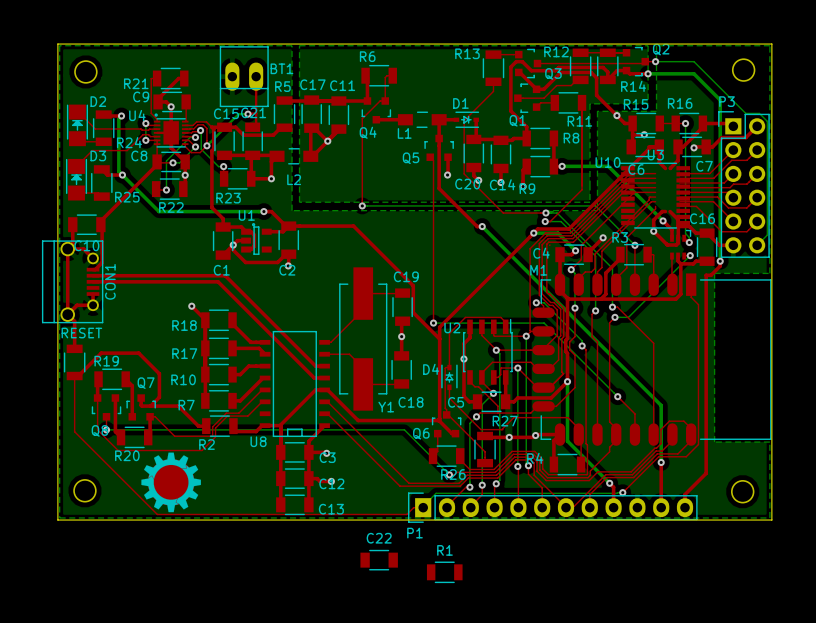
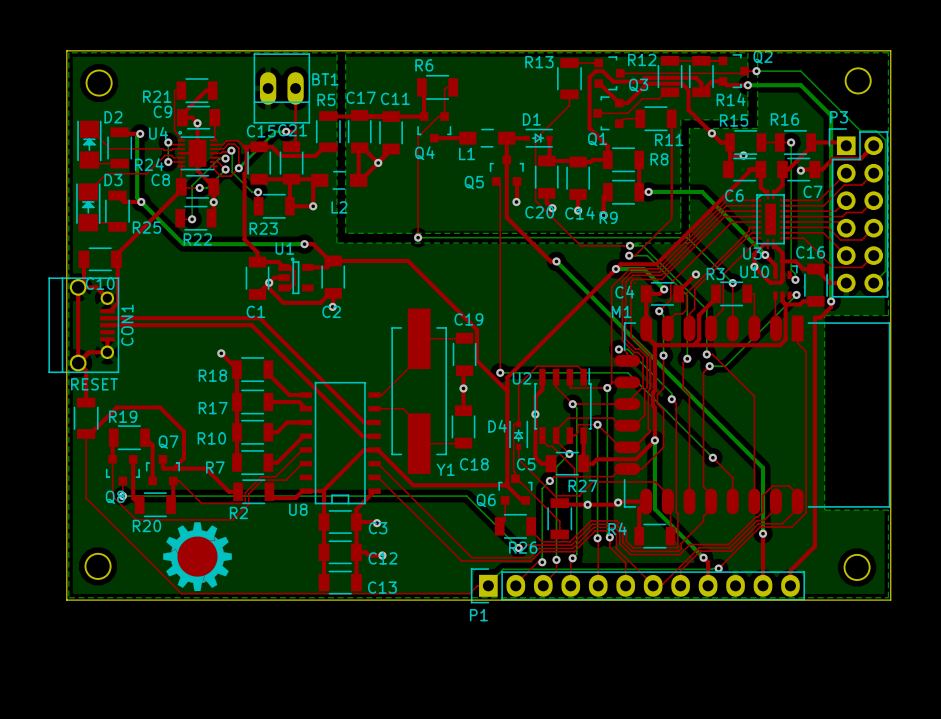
U3 name position: U3 (655, 155) -> U3 (752, 253)
U10 name position: U10 (608, 162) -> U10 (754, 271)
U3 footprint: [619, 162, 691, 229] -> [751, 189, 790, 250]
C22: (379, 560) -> none
R1: (444, 572) -> none

